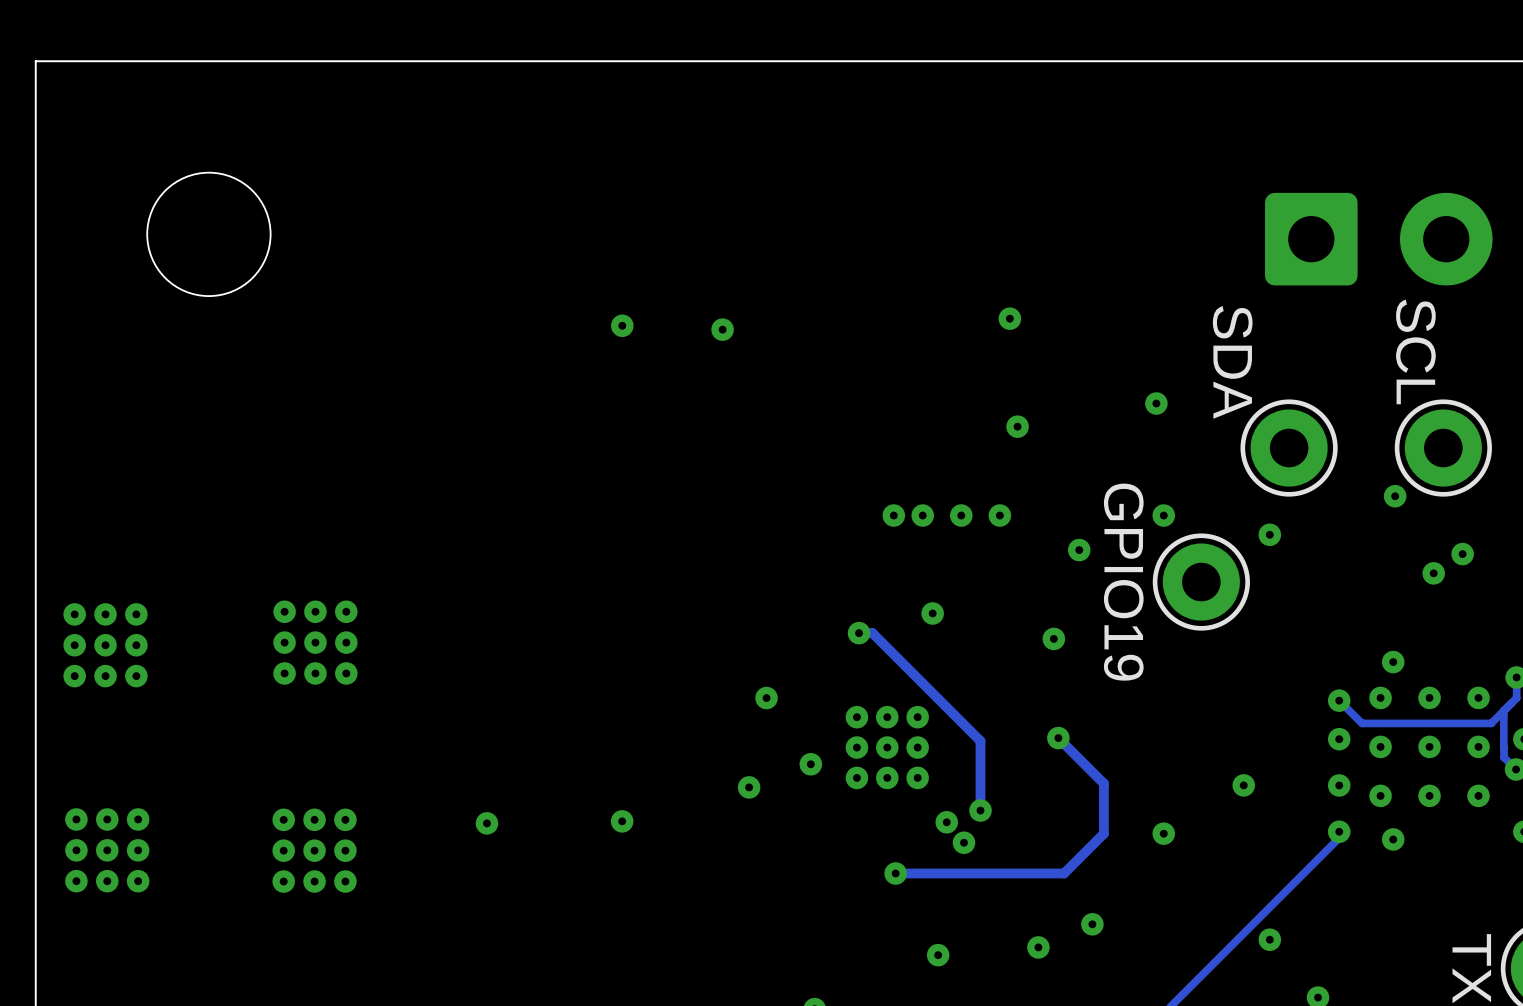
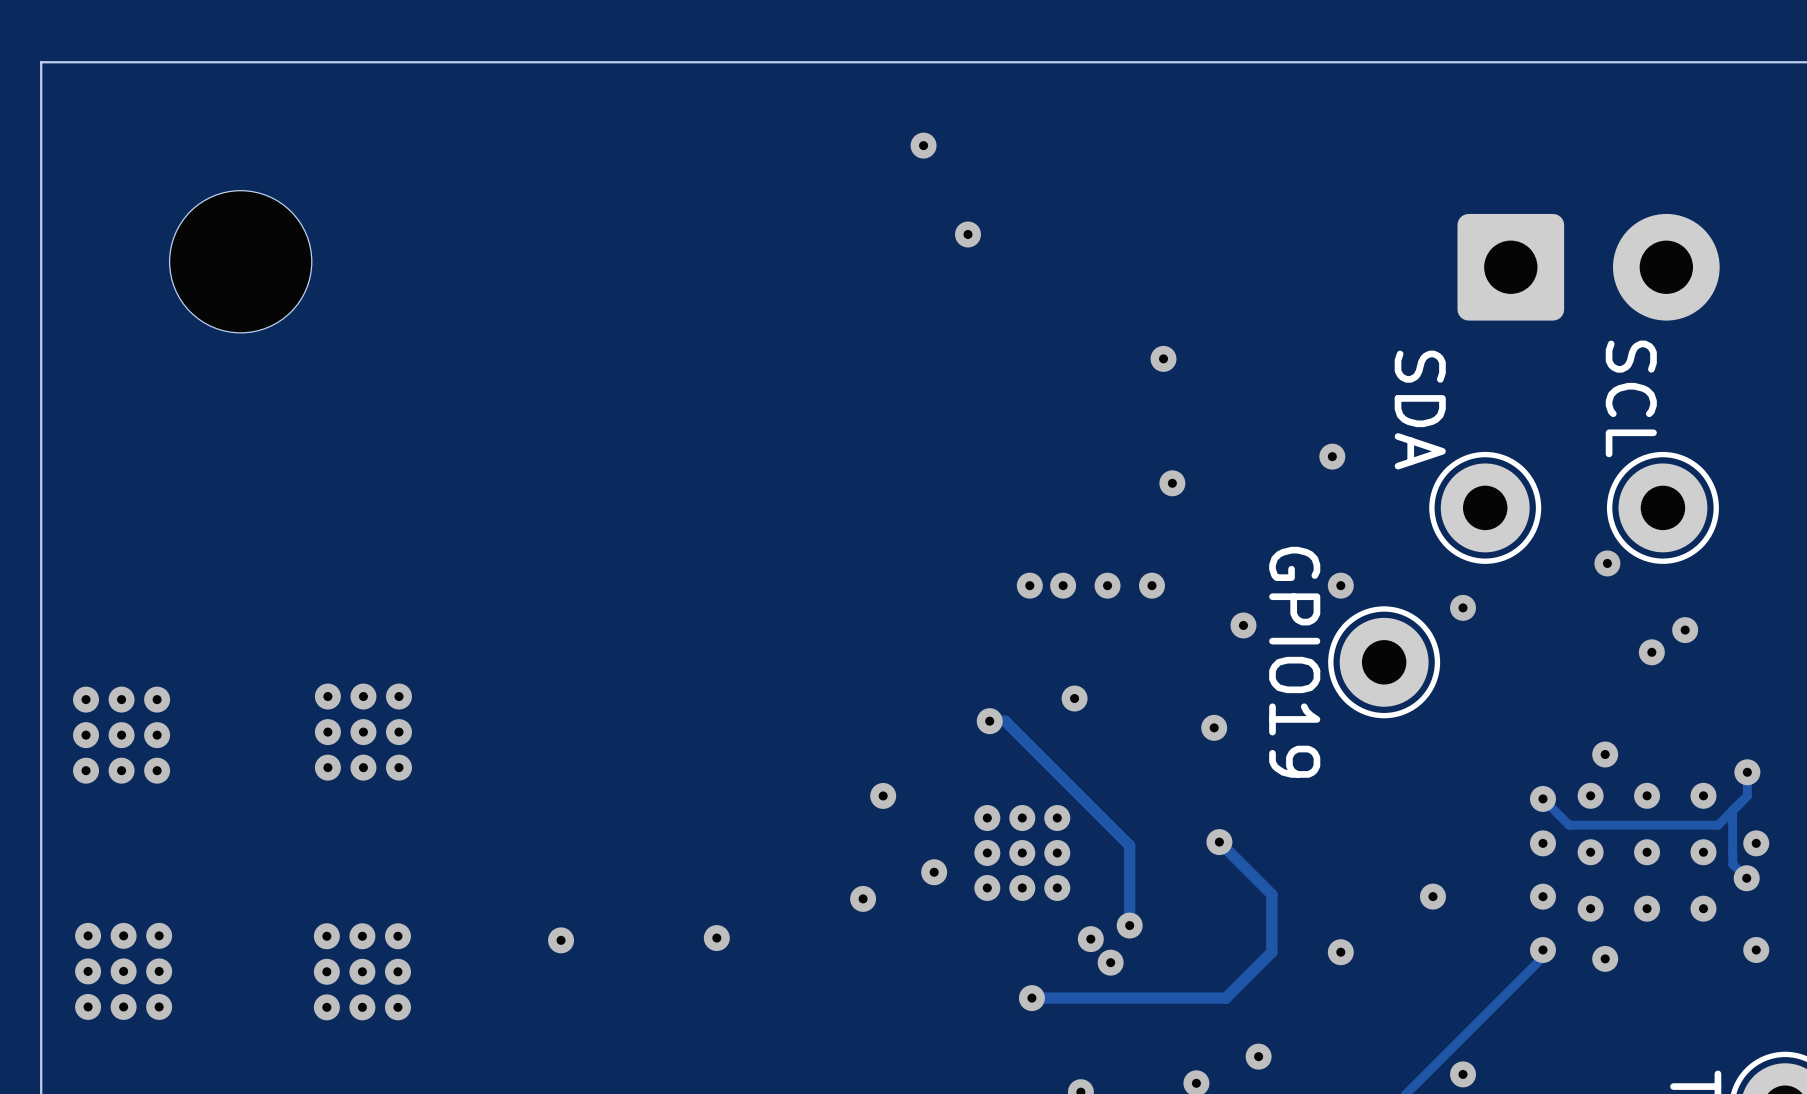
via: none -> (923, 145)
via: none -> (968, 234)
via: (622, 325) -> none
via: (722, 329) -> none

